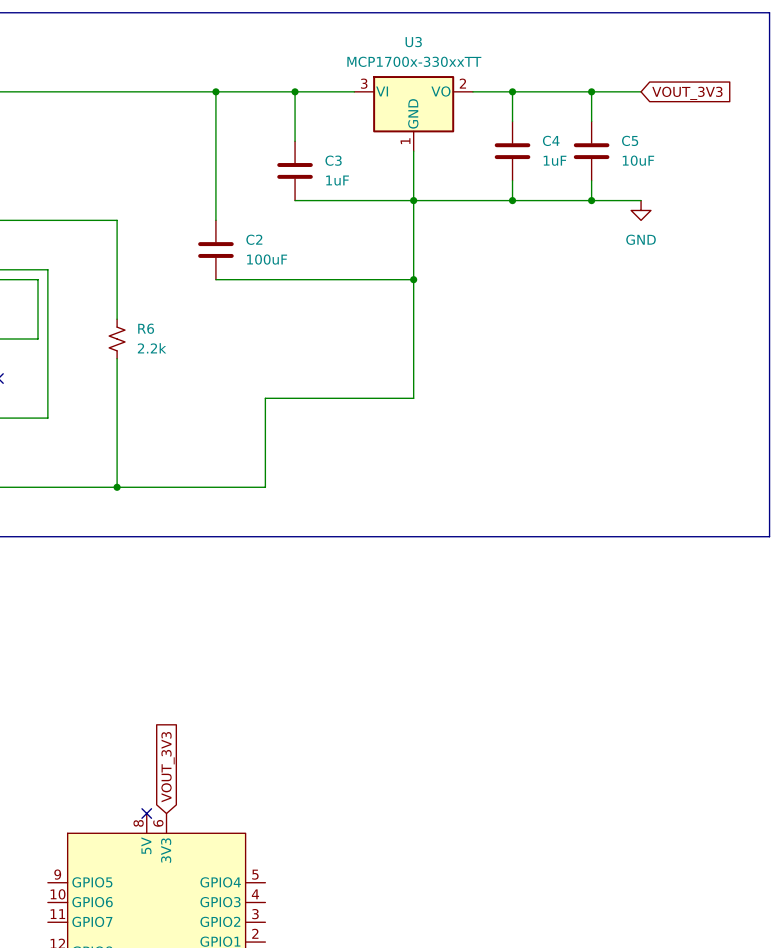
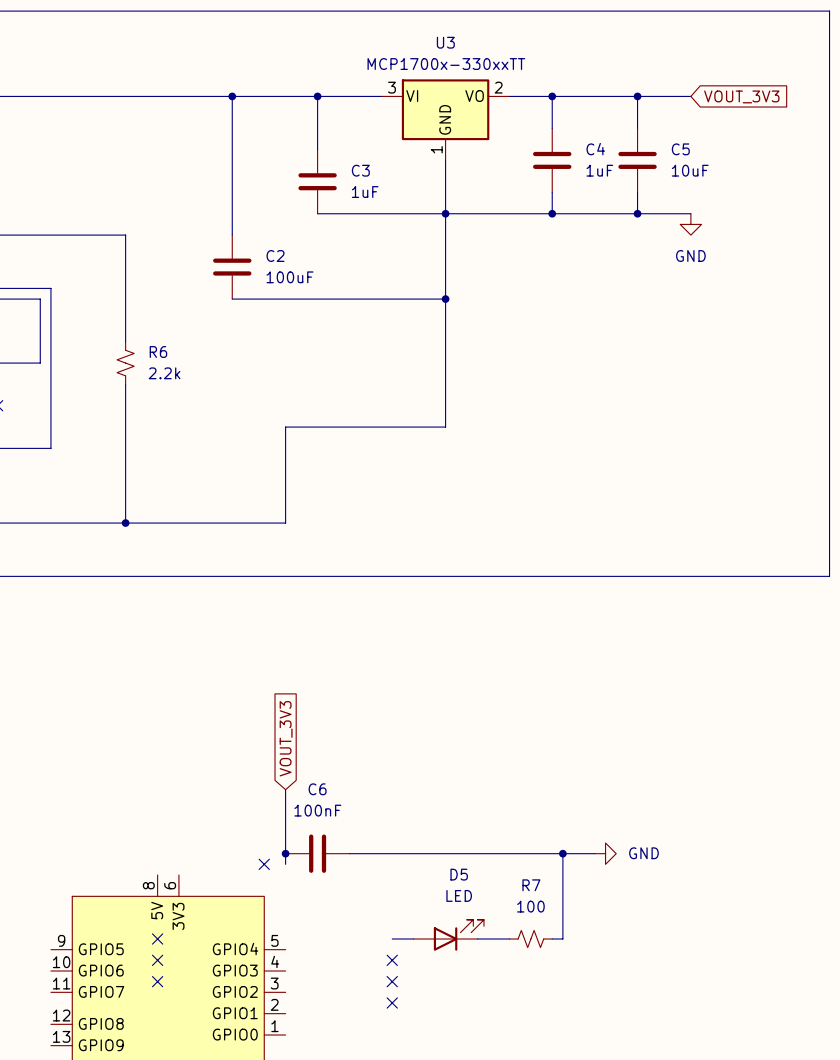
wire: none -> (285, 789) (285, 864)
global label position: VOUT_3V3 (168, 767) -> VOUT_3V3 (286, 738)
junction: none -> (285, 853)
C6: none -> 100nF (317, 853)
wire: none -> (349, 853) (594, 853)
wire: none -> (562, 853) (562, 939) (552, 939)
junction: none -> (562, 853)
power symbol: none -> GND (605, 853)
no-connect mark: none -> (264, 864)
no-connect mark: (146, 813) -> none
D5: none -> LED (448, 935)
no-connect mark: none -> (157, 939)
wire: none -> (392, 939) (413, 939)
wire: none -> (477, 939) (509, 939)
R7: none -> 100 (530, 939)
no-connect mark: none -> (157, 960)
no-connect mark: none -> (392, 960)
no-connect mark: none -> (157, 981)
no-connect mark: none -> (392, 981)
no-connect mark: none -> (392, 1003)

